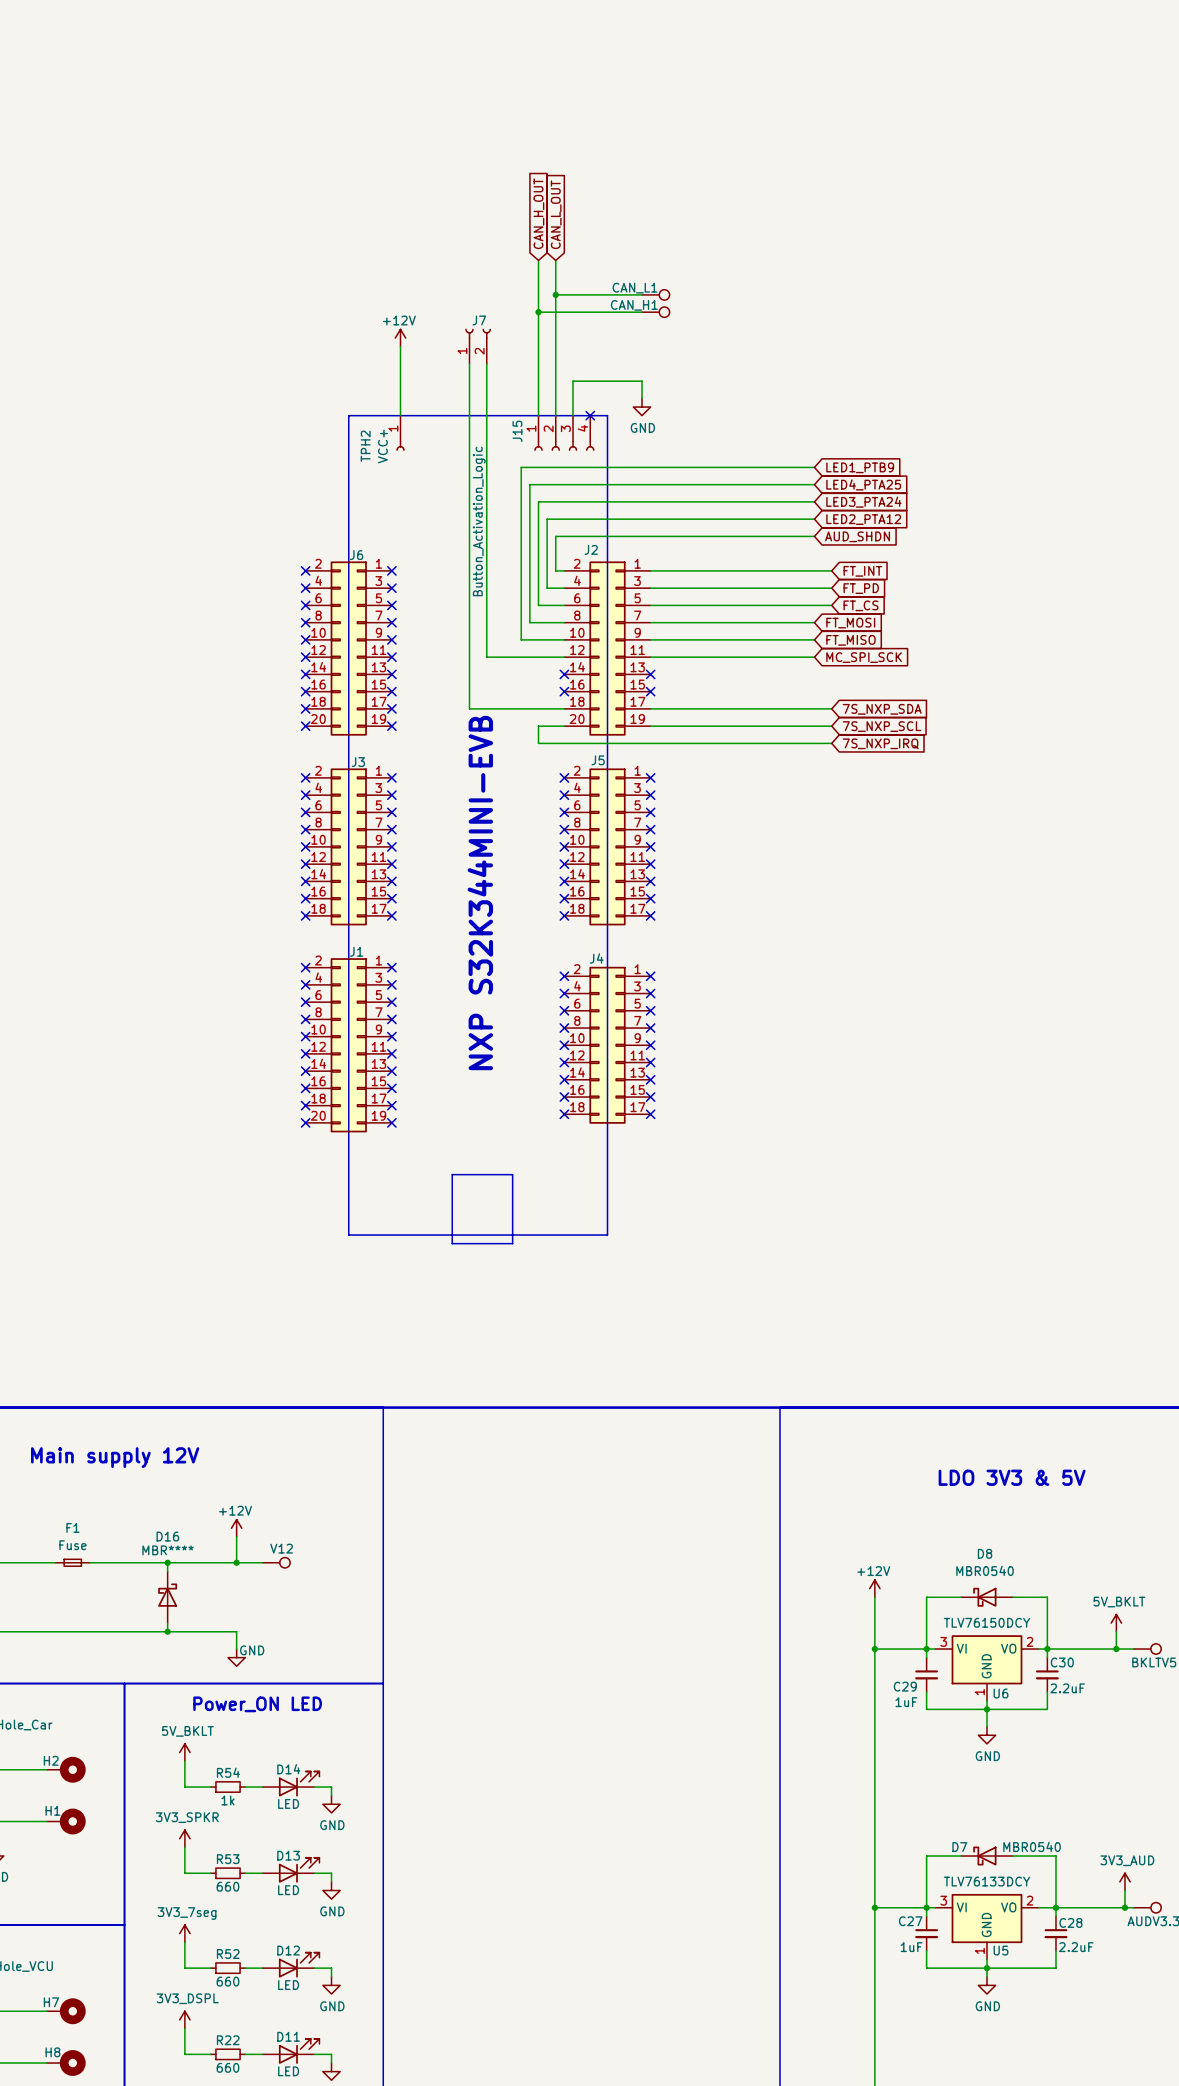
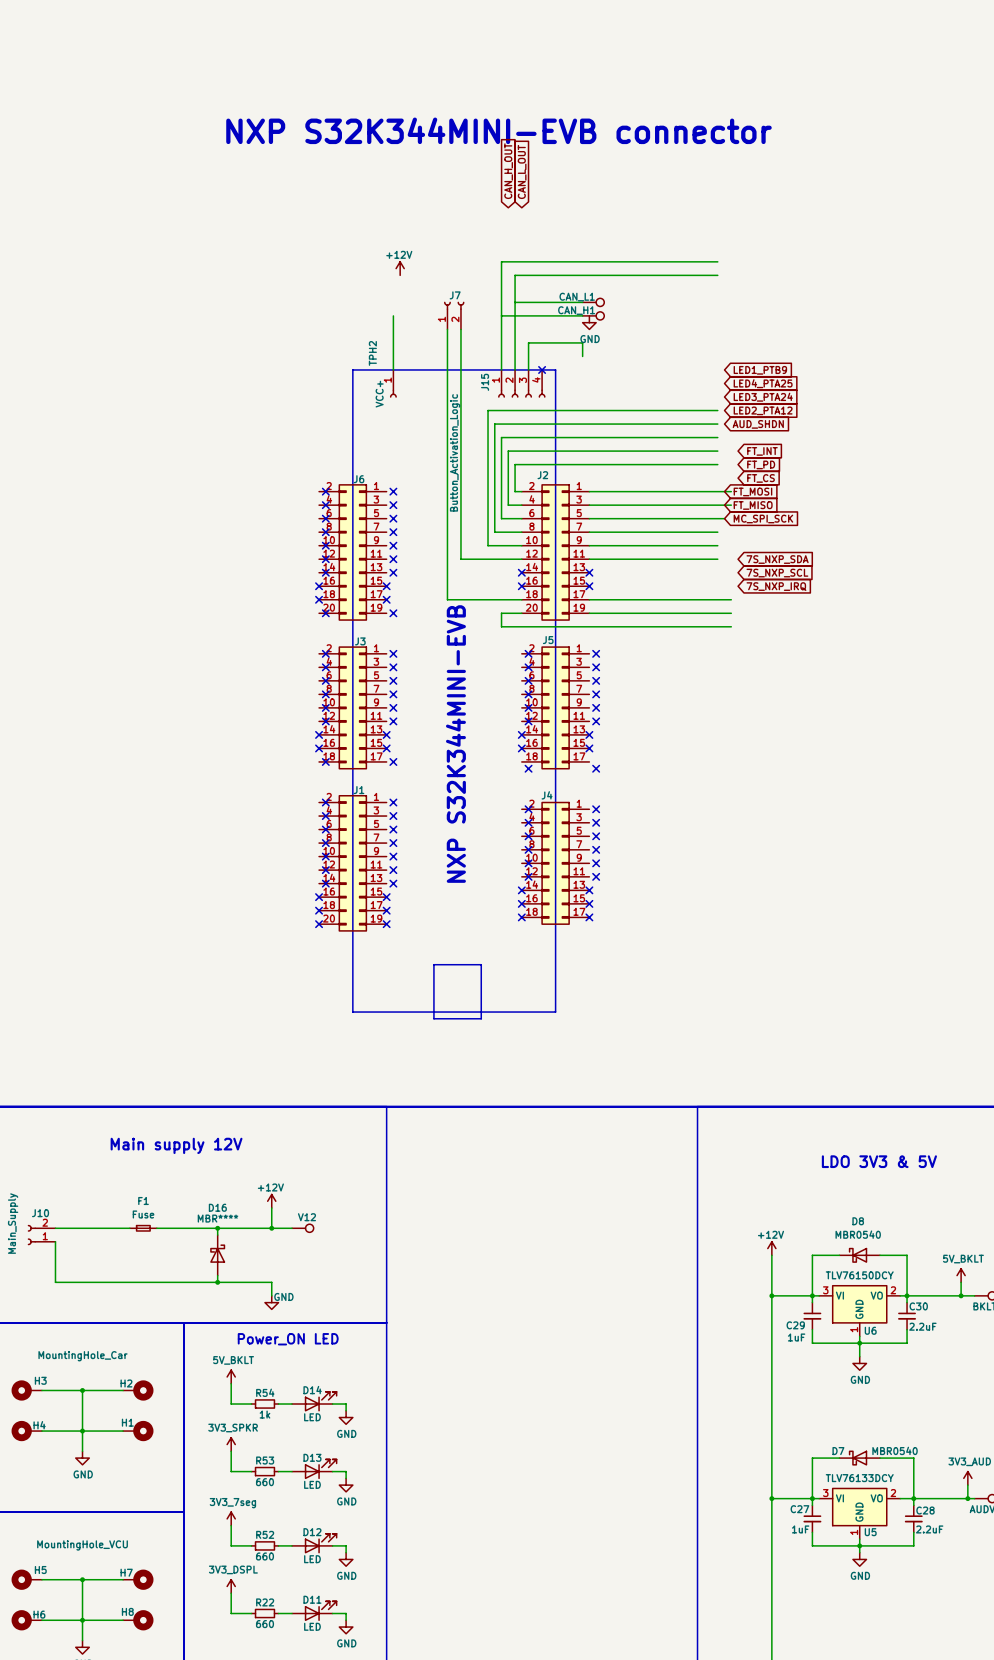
text: none -> NXP S32K344MINI-EVB connector (498, 130)
wire: (538, 260) (538, 415) -> none
wire: (555, 260) (555, 415) -> none
wire: (555, 294) (642, 294) -> none
junction: (555, 294) -> none
CAN_L1 position: (655, 294) -> (593, 302)
wire: (538, 312) (642, 312) -> (501, 315) (582, 315)
junction: (538, 312) -> none
CAN_H1 position: (655, 312) -> (593, 315)
wire: none -> (717, 261) (501, 261) (501, 369)
wire: (400, 346) (400, 415) -> (393, 315) (393, 369)
J7 position: (478, 346) -> (454, 315)
wire: none -> (717, 275) (515, 275) (515, 369)
wire: (469, 363) (469, 708) (478, 708) -> (460, 329) (460, 559)
wire: (486, 363) (486, 657) (529, 657) -> (501, 491) (501, 518)
wire: (573, 381) (573, 415) -> (535, 302) (515, 302)
line: (348, 415) (607, 415) (607, 1235) (348, 1235) (348, 415) -> (352, 369) (555, 369) (555, 1012) (352, 1012) (352, 369)
wire: none -> (447, 329) (447, 599) (521, 599)
no-connect mark: (590, 415) -> none
TPH2 position: (400, 433) -> (393, 383)
J15 position: (564, 433) -> (521, 383)
wire: none -> (582, 356) (582, 342) (528, 342) (528, 369)
no-connect mark: none -> (542, 369)
wire: (814, 467) (521, 467) (521, 536) -> (521, 424) (494, 424)
wire: (814, 484) (529, 484) (529, 553) -> (717, 437) (501, 437)
wire: (814, 501) (538, 501) (538, 570) -> none
wire: (547, 519) (547, 588) -> (515, 410) (488, 410) (488, 545) (521, 545)
wire: (805, 519) (814, 519) -> (724, 491) (731, 491)
wire: (555, 536) (555, 570) -> (508, 451) (521, 451)
wire: (805, 536) (814, 536) -> (724, 505) (731, 505)
no-connect mark: (305, 570) -> none
no-connect mark: (391, 570) -> none
wire: (805, 570) (831, 570) -> none
no-connect mark: (305, 588) -> none
no-connect mark: (391, 588) -> none
wire: (805, 588) (831, 588) -> none
no-connect mark: (305, 605) -> none
no-connect mark: (391, 605) -> none
wire: (538, 605) (564, 605) -> (508, 478) (508, 505)
wire: (650, 605) (831, 605) -> (589, 599) (731, 599)
wire: (529, 622) (547, 622) -> (515, 464) (515, 491)
wire: (521, 639) (538, 639) -> (494, 505) (494, 532) (521, 532)
J6 position: (348, 648) -> (352, 552)
J2 position: (607, 648) -> (555, 552)
no-connect mark: (564, 674) -> none
wire: none -> (589, 532) (717, 532)
no-connect mark: (650, 674) -> none
no-connect mark: (564, 691) -> none
wire: none -> (589, 545) (717, 545)
no-connect mark: (650, 691) -> none
wire: (805, 708) (831, 708) -> none
no-connect mark: none -> (521, 572)
wire: (564, 726) (538, 726) (538, 743) (831, 743) -> (521, 613) (501, 613) (501, 626) (731, 626)
no-connect mark: none -> (589, 572)
wire: (650, 726) (831, 726) -> (589, 613) (731, 613)
no-connect mark: none -> (319, 586)
no-connect mark: none -> (386, 586)
no-connect mark: none -> (521, 586)
no-connect mark: none -> (589, 586)
no-connect mark: none -> (319, 599)
no-connect mark: none -> (386, 599)
no-connect mark: (564, 777) -> none
no-connect mark: (650, 777) -> none
no-connect mark: (305, 795) -> none
no-connect mark: (391, 795) -> none
no-connect mark: (564, 795) -> none
no-connect mark: (650, 795) -> none
no-connect mark: (305, 812) -> none
no-connect mark: (391, 812) -> none
no-connect mark: (564, 812) -> none
no-connect mark: (650, 812) -> none
J3 position: (348, 846) -> (352, 707)
J5 position: (607, 846) -> (555, 707)
text position: NXP S32K344MINI-EVB (480, 893) -> NXP S32K344MINI-EVB (455, 744)
no-connect mark: none -> (319, 734)
no-connect mark: none -> (386, 734)
no-connect mark: none -> (521, 734)
no-connect mark: none -> (589, 734)
no-connect mark: none -> (319, 748)
no-connect mark: none -> (386, 748)
no-connect mark: none -> (521, 748)
no-connect mark: none -> (589, 748)
no-connect mark: (305, 984) -> none
no-connect mark: (391, 984) -> none
no-connect mark: (564, 993) -> none
no-connect mark: (650, 993) -> none
no-connect mark: (305, 1002) -> none
no-connect mark: (391, 1002) -> none
no-connect mark: (564, 1010) -> none
no-connect mark: (650, 1010) -> none
J1 position: (348, 1045) -> (352, 863)
J4 position: (607, 1045) -> (555, 863)
no-connect mark: none -> (521, 890)
no-connect mark: none -> (589, 890)
no-connect mark: none -> (319, 897)
no-connect mark: none -> (386, 897)
no-connect mark: none -> (521, 903)
no-connect mark: none -> (589, 903)
no-connect mark: none -> (319, 910)
no-connect mark: none -> (386, 910)
no-connect mark: none -> (521, 917)
no-connect mark: none -> (589, 917)
no-connect mark: none -> (319, 924)
no-connect mark: none -> (386, 924)
line: (452, 1174) (512, 1174) (512, 1243) (452, 1243) (452, 1174) -> (433, 964) (481, 964) (481, 1018) (433, 1018) (433, 964)

